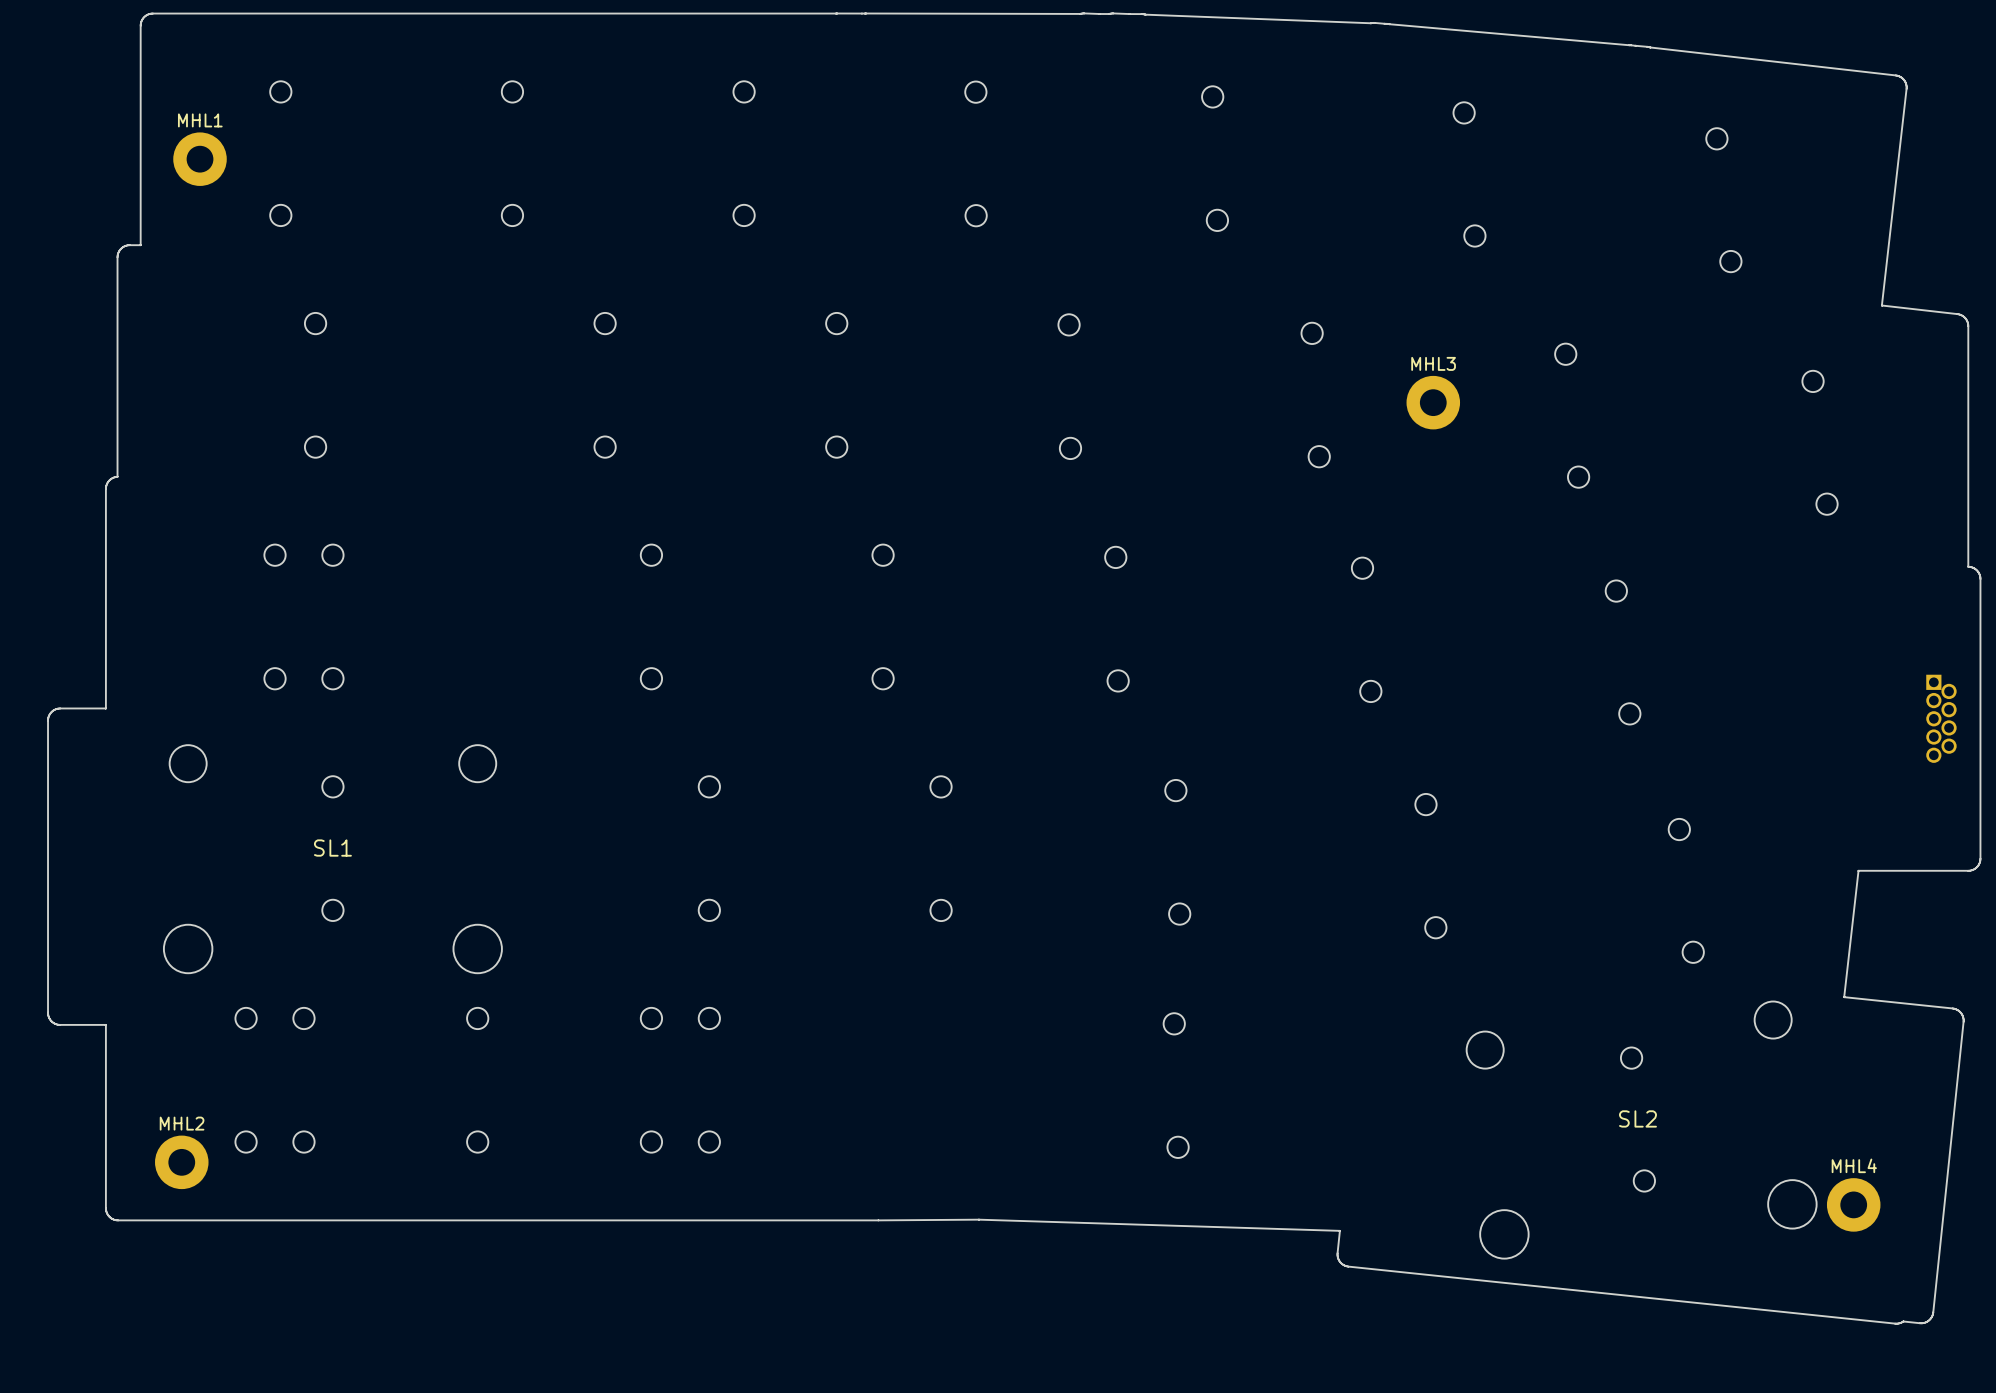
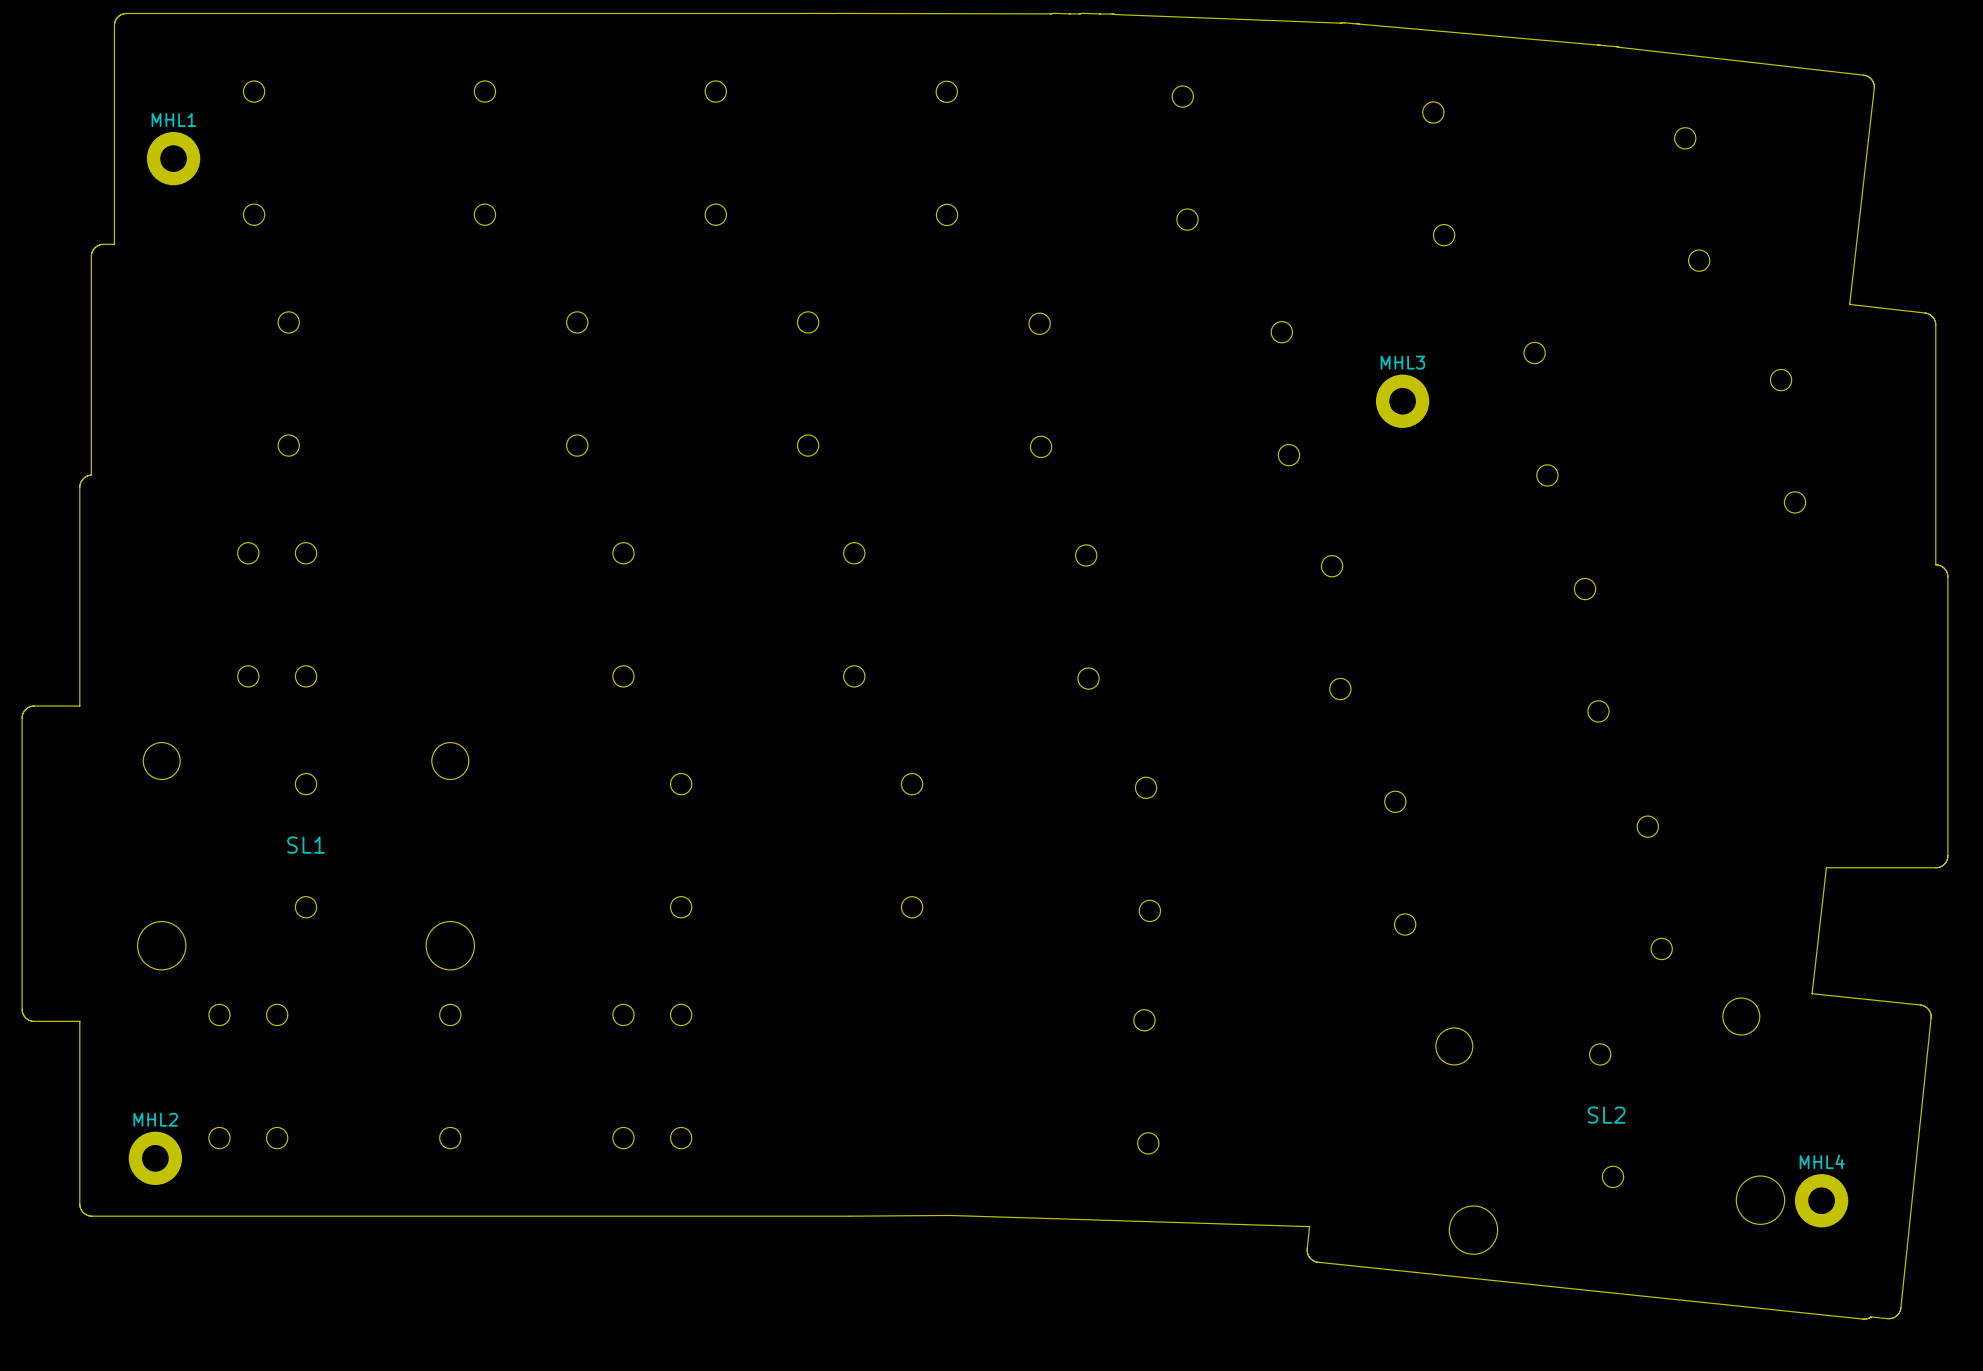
part: (1941, 718) -> none

